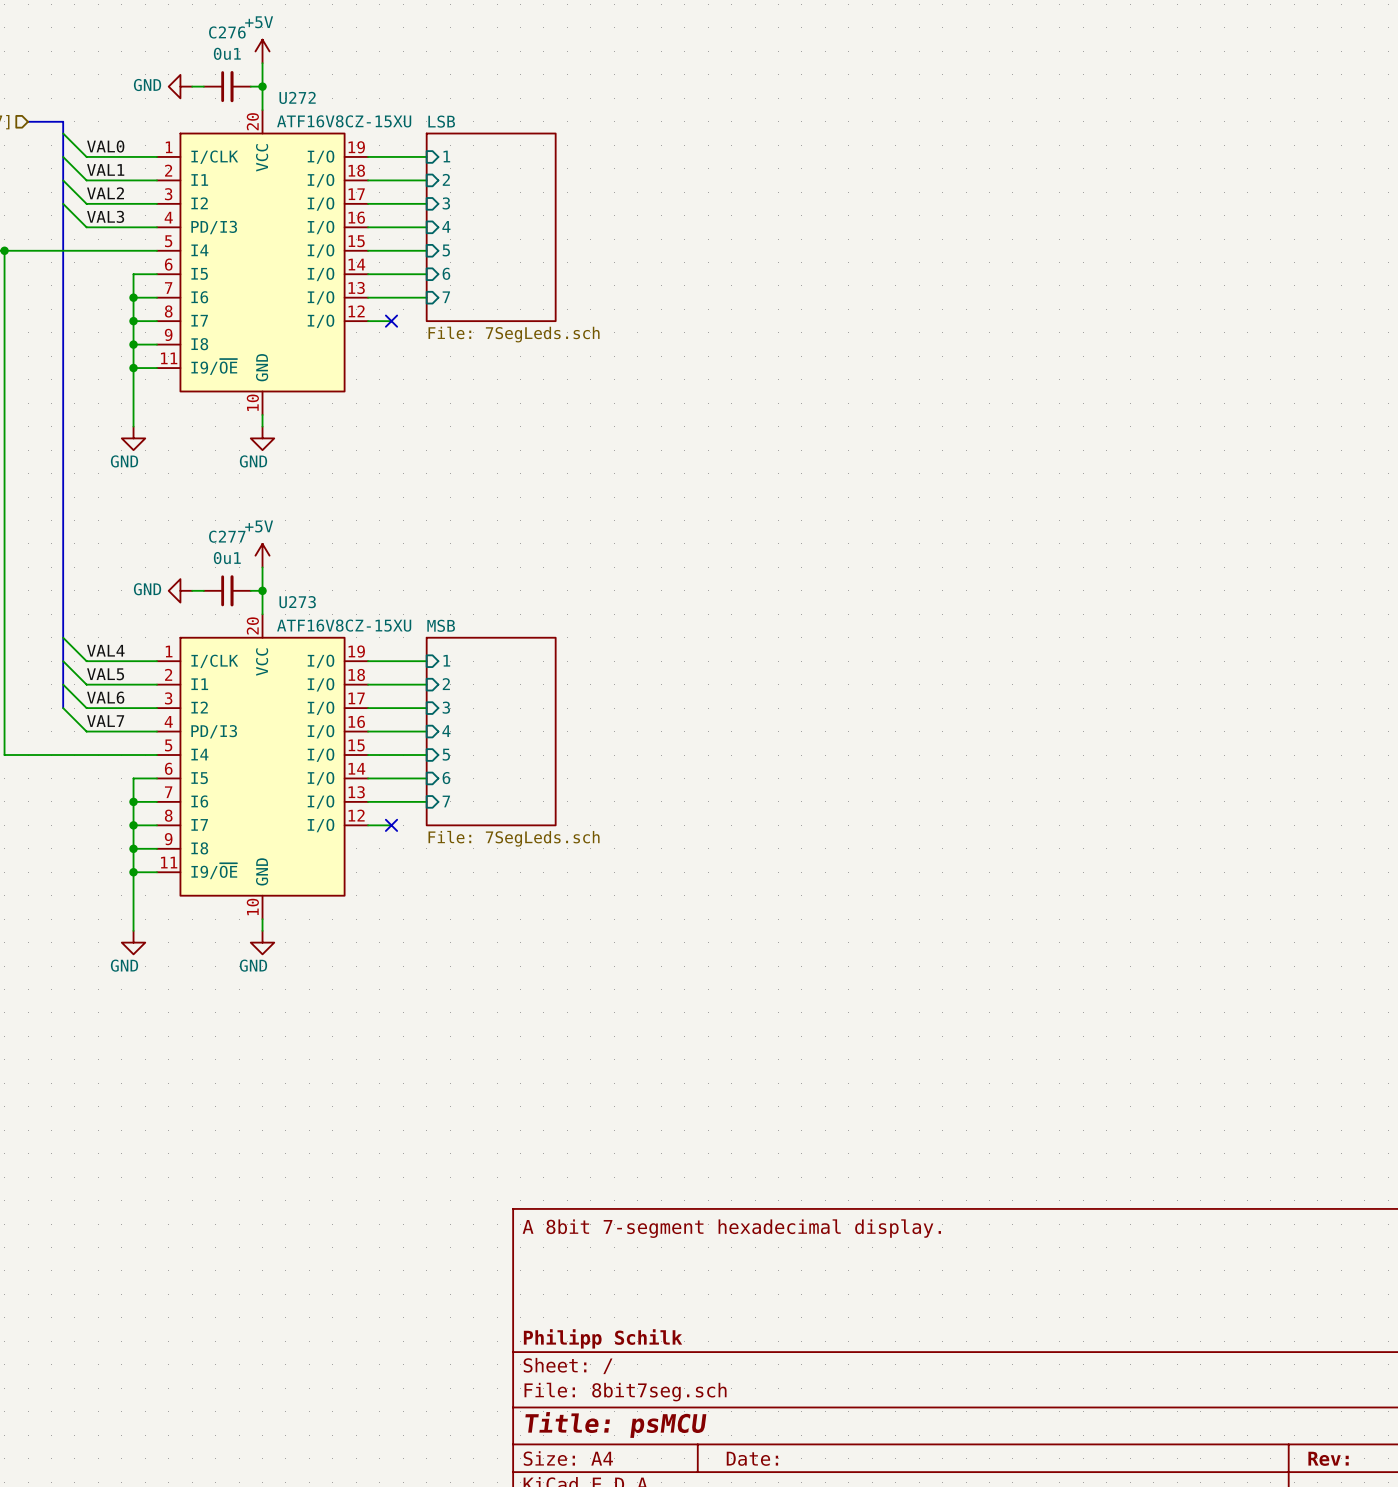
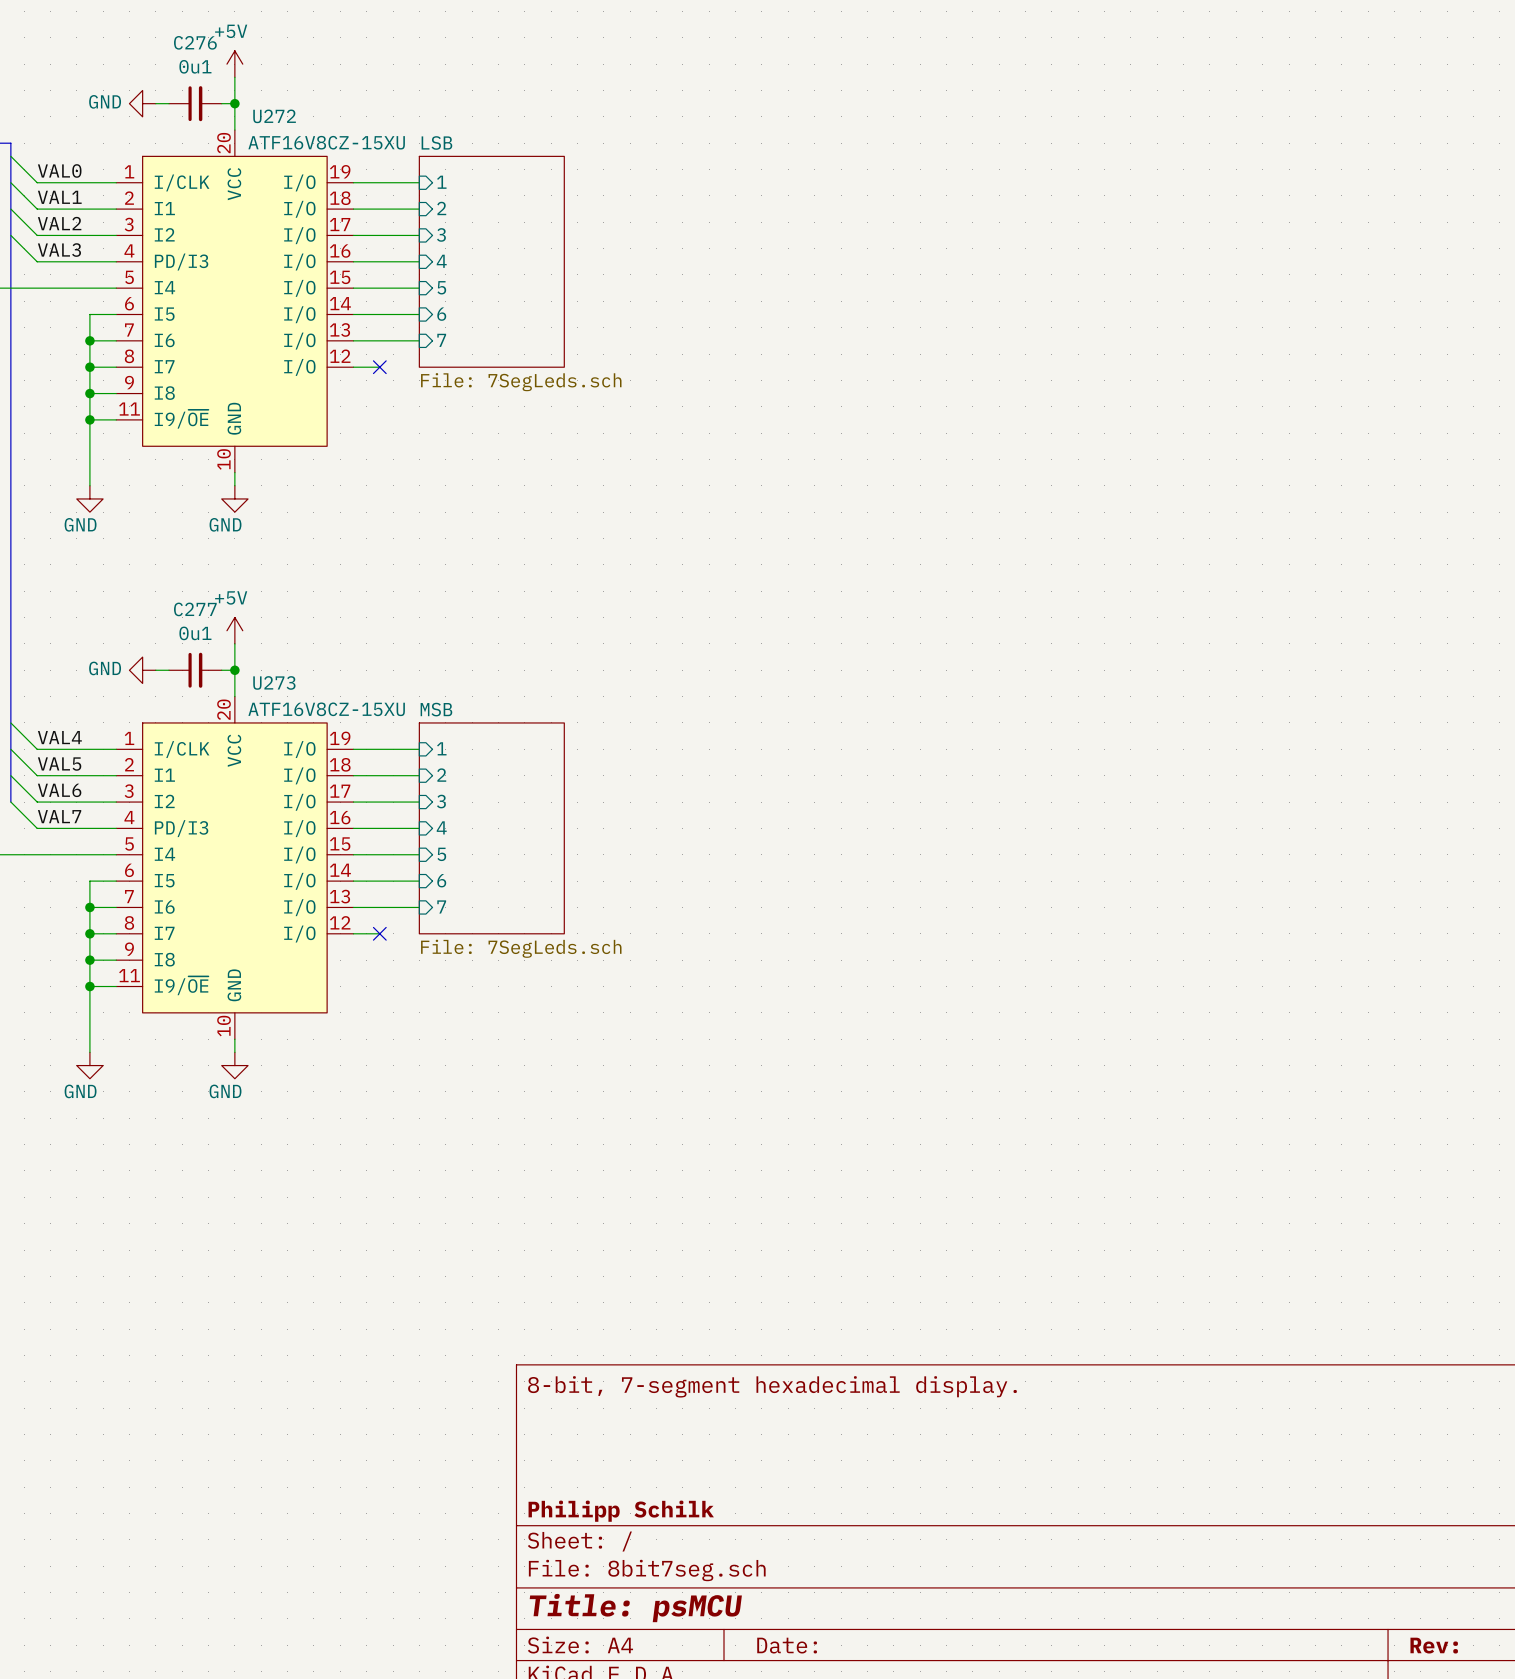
title block: A 8bit 7-segment hexadecimal display. (731, 1228) -> 8-bit, 7-segment hexadecimal display. (772, 1386)

